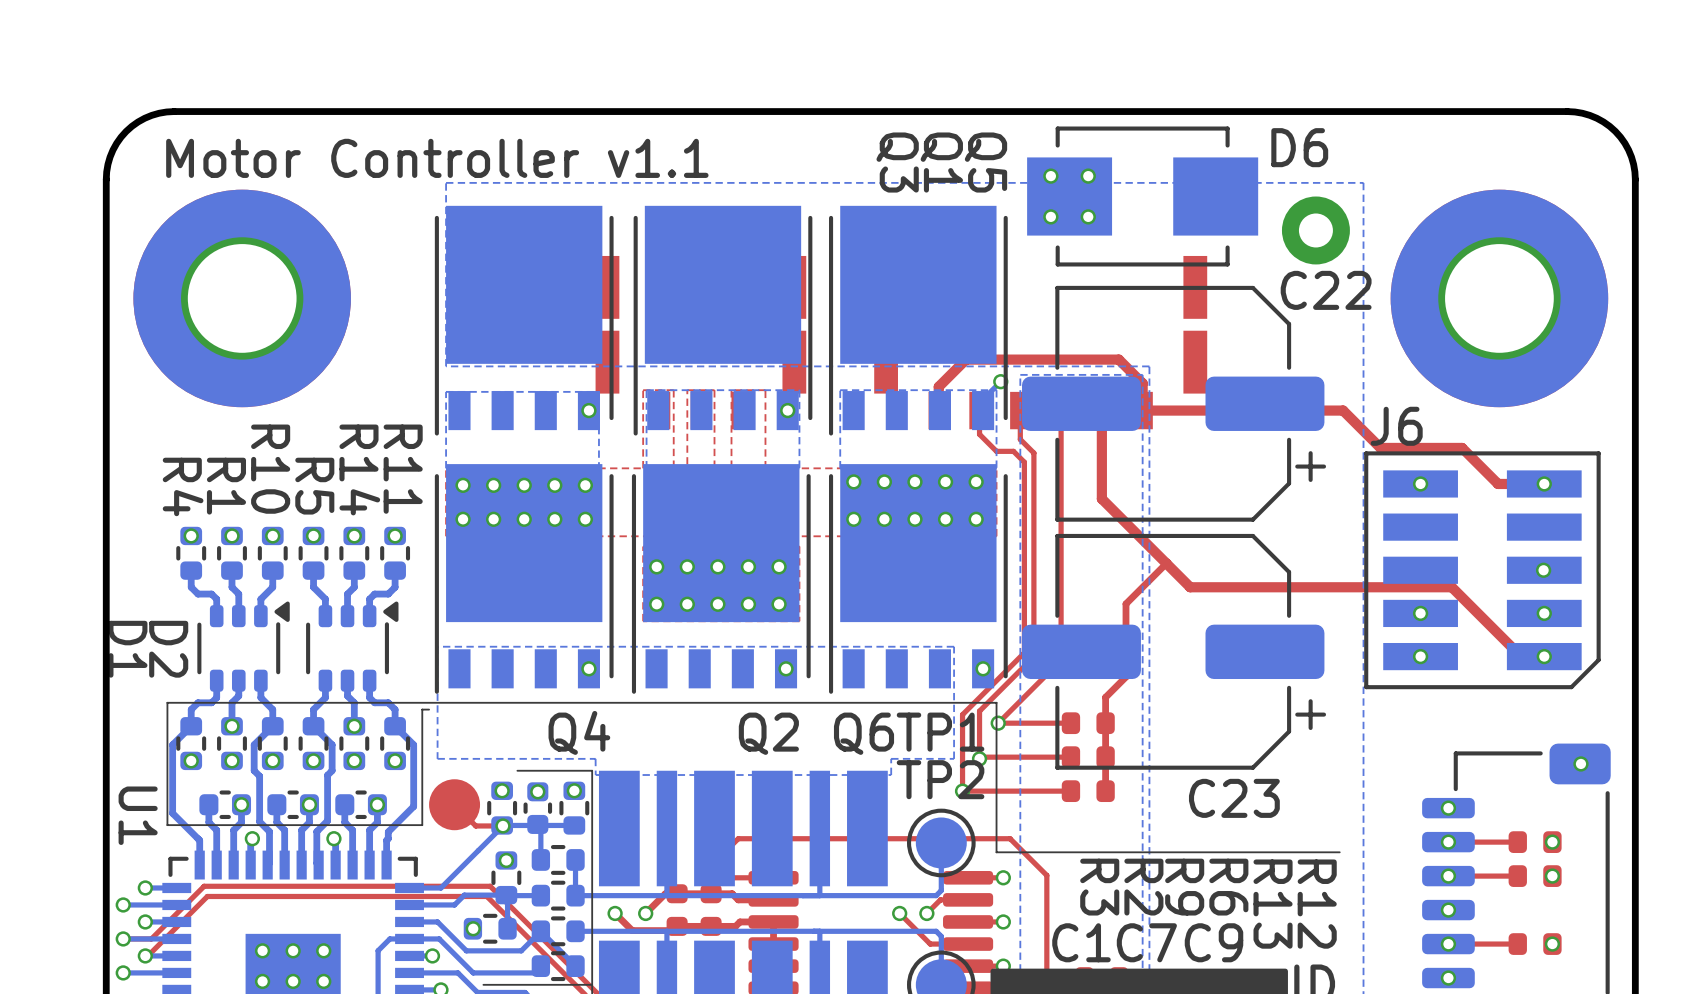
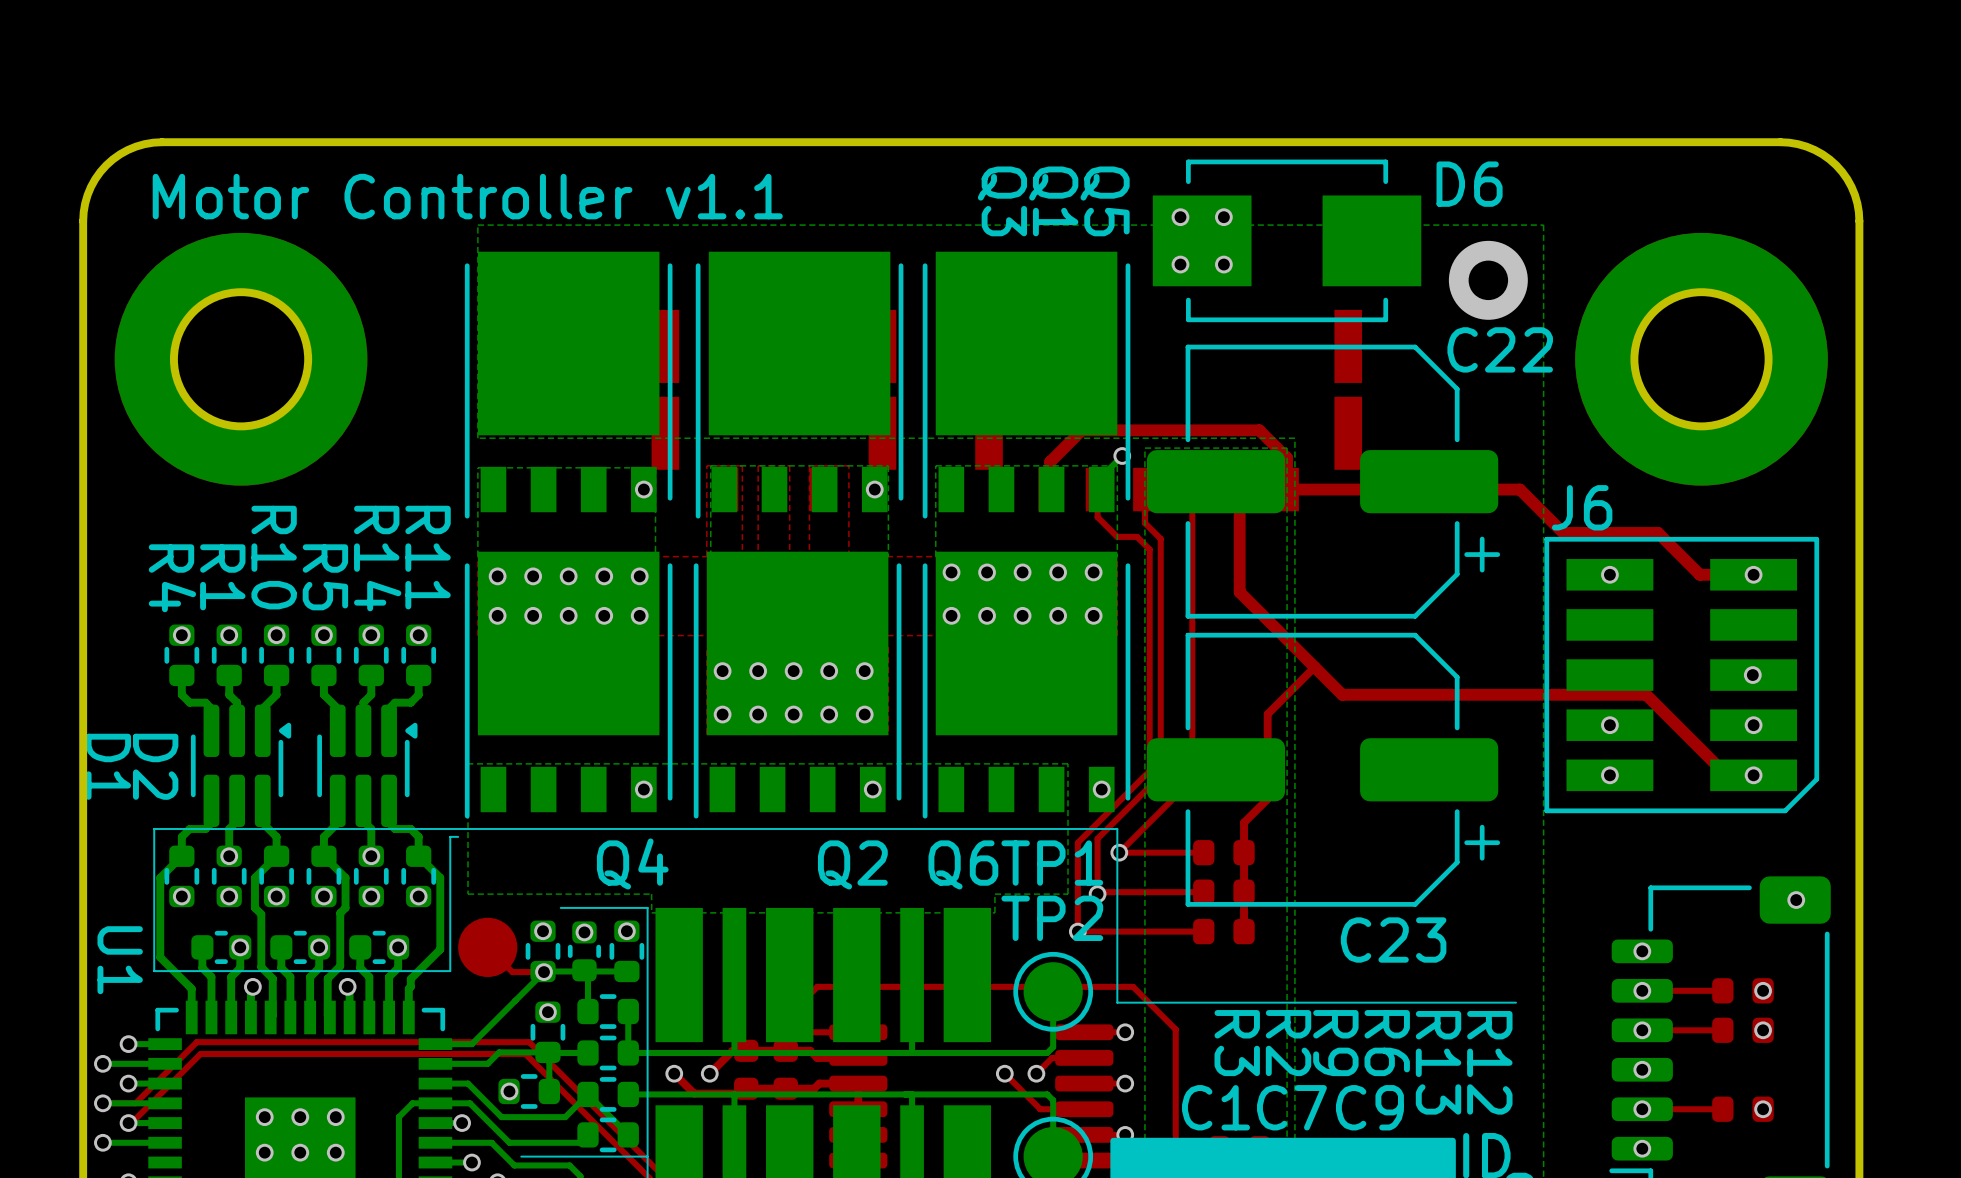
D1 footprint: [197, 601, 290, 692] -> [190, 704, 292, 828]
D2 footprint: [306, 601, 399, 692] -> [317, 704, 418, 828]

